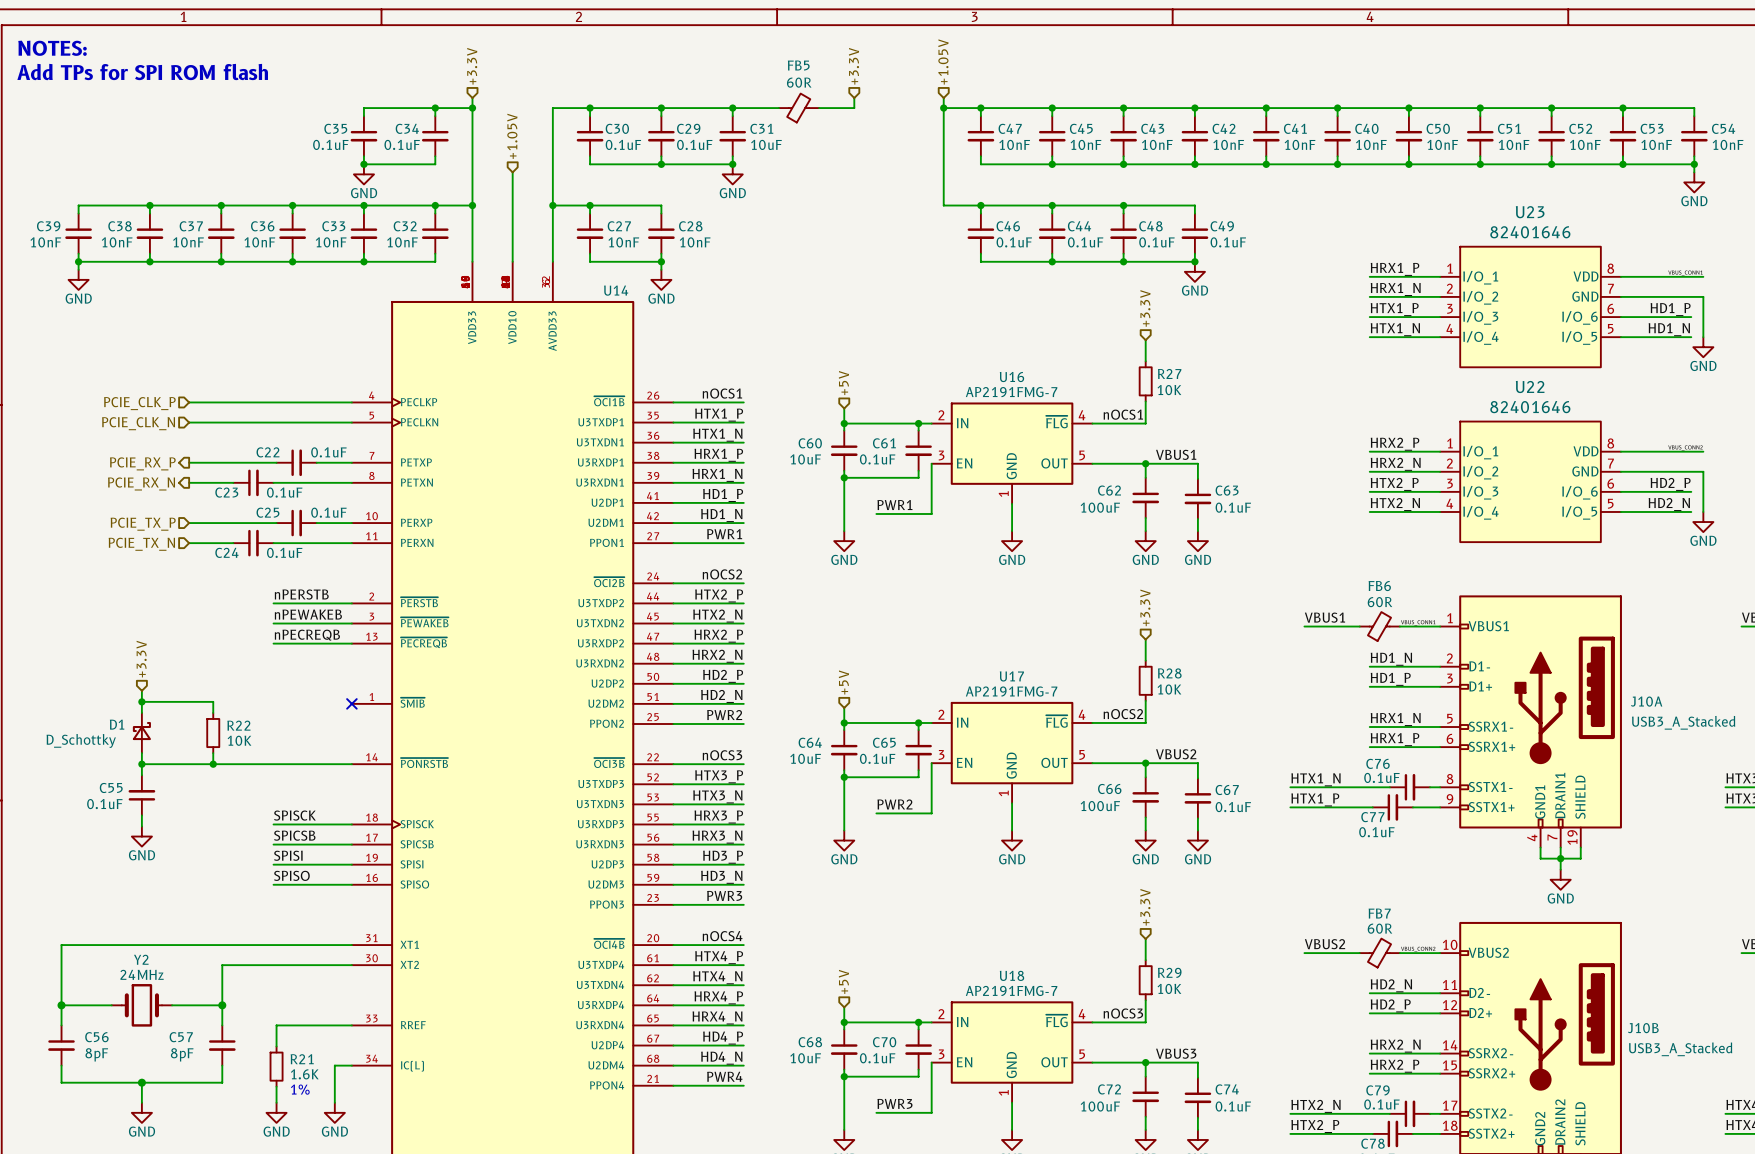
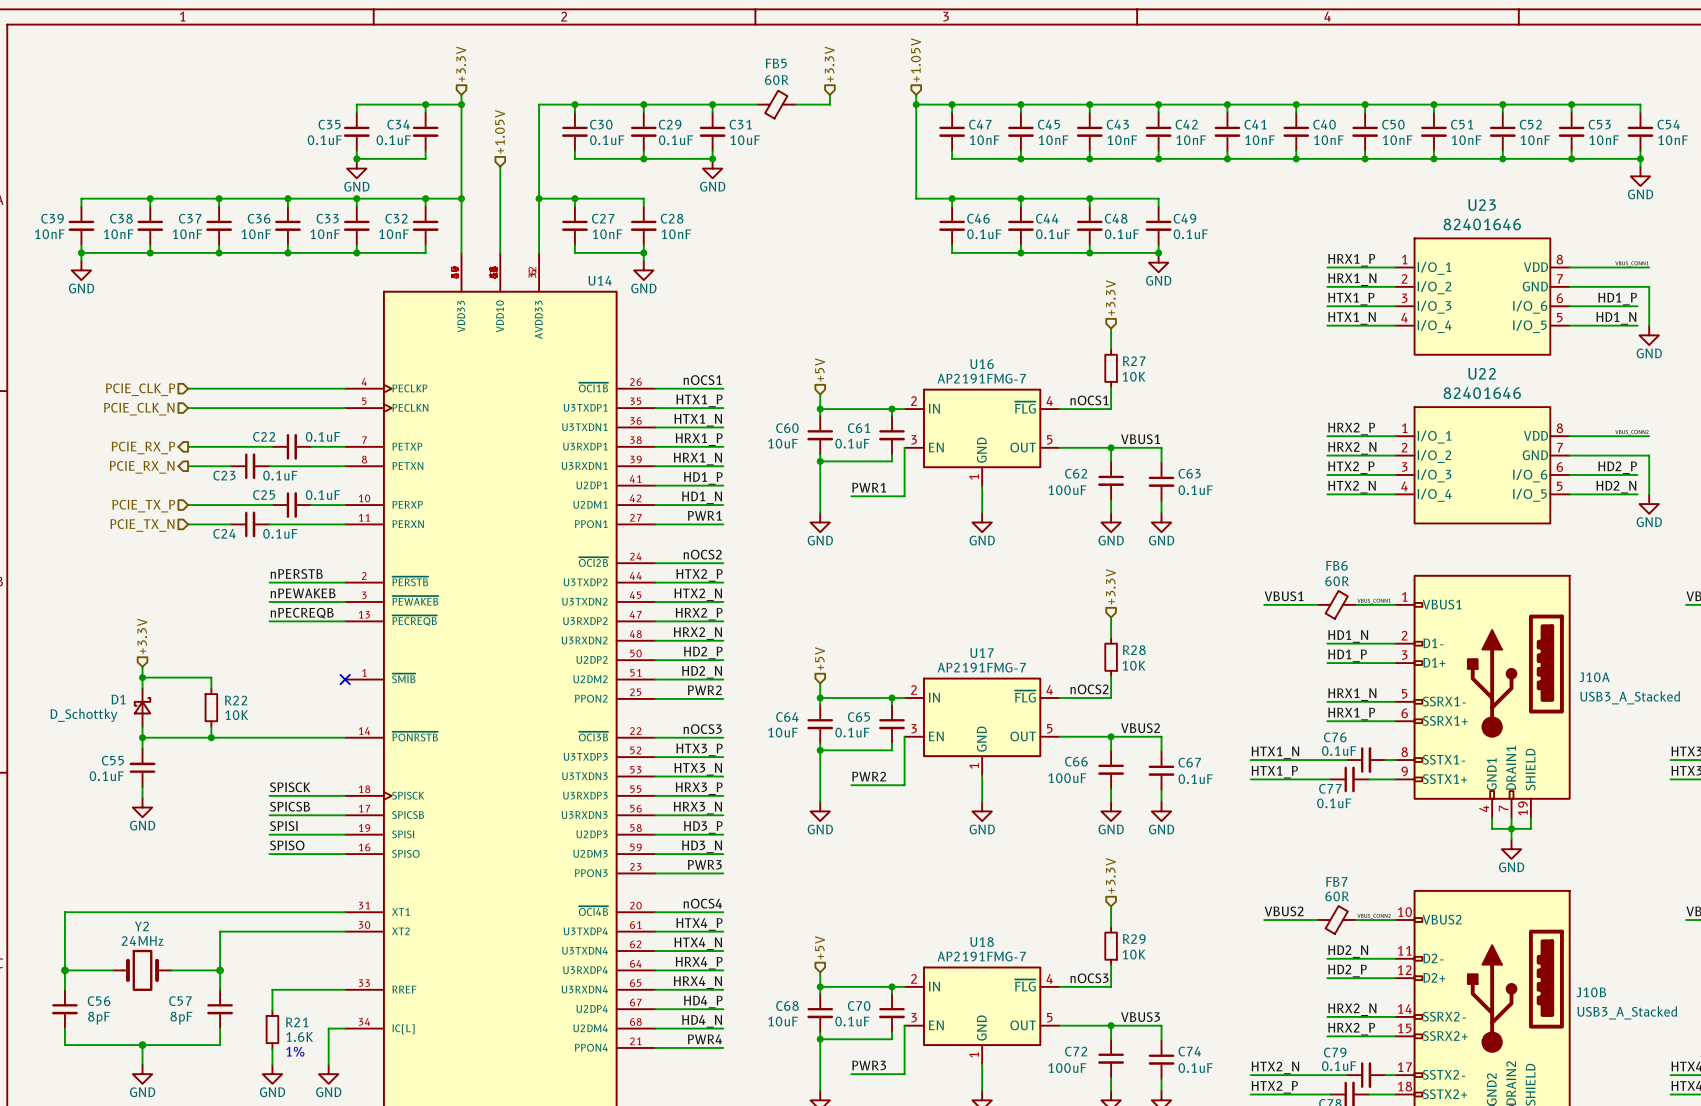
text: NOTES: (52, 48) -> none
text: Add TPs for SPI ROM flash (142, 72) -> none

